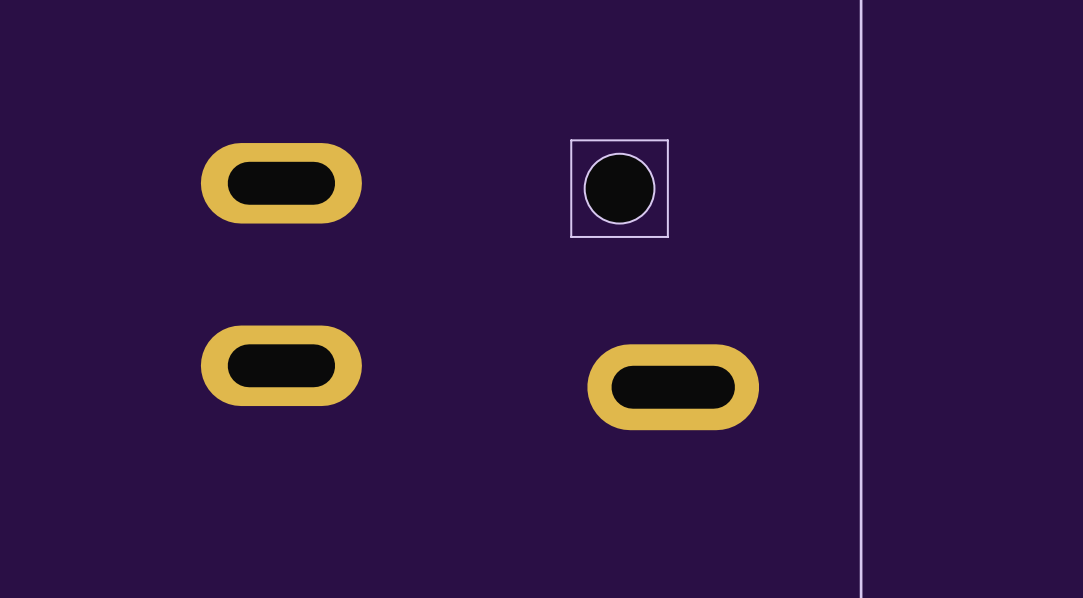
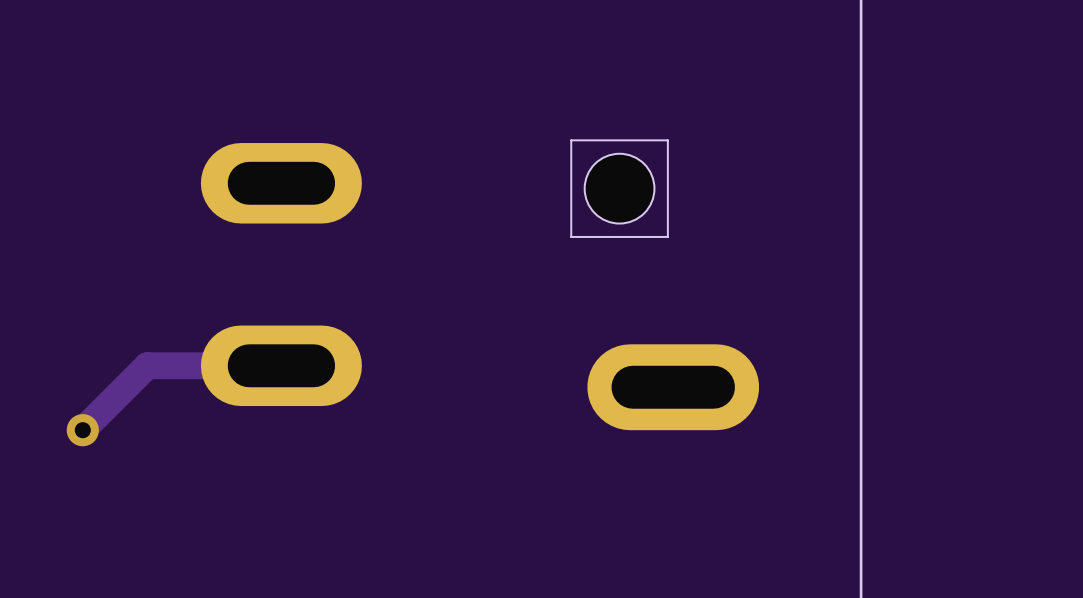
track: none -> (281, 365) (147, 365) (82, 430)
via: none -> (82, 430)

